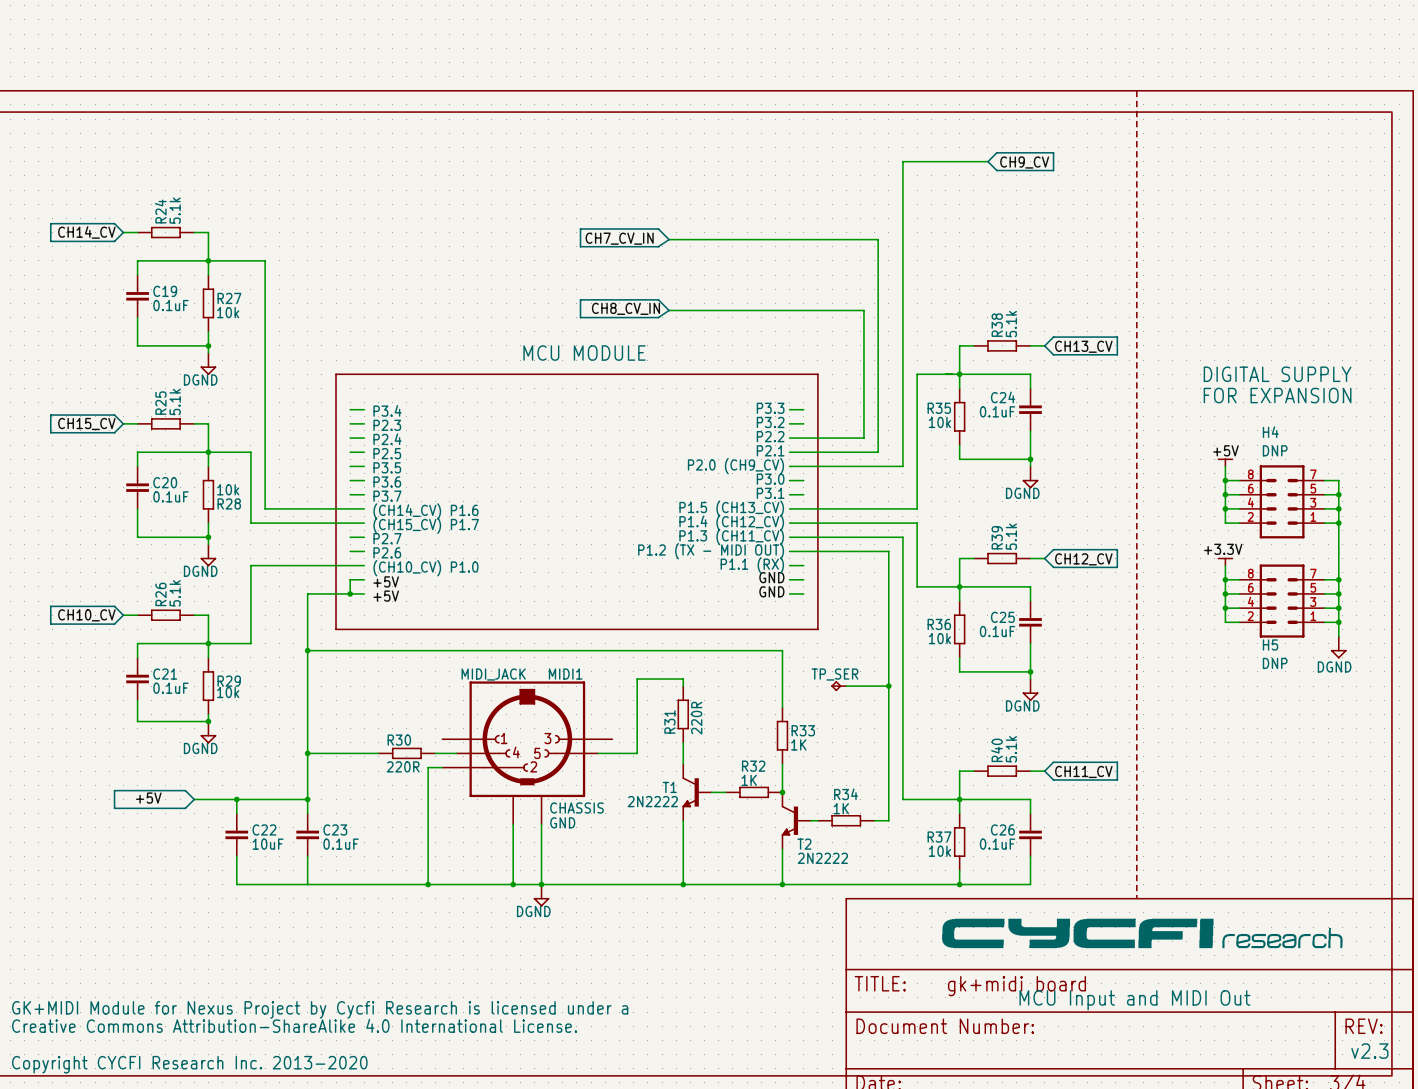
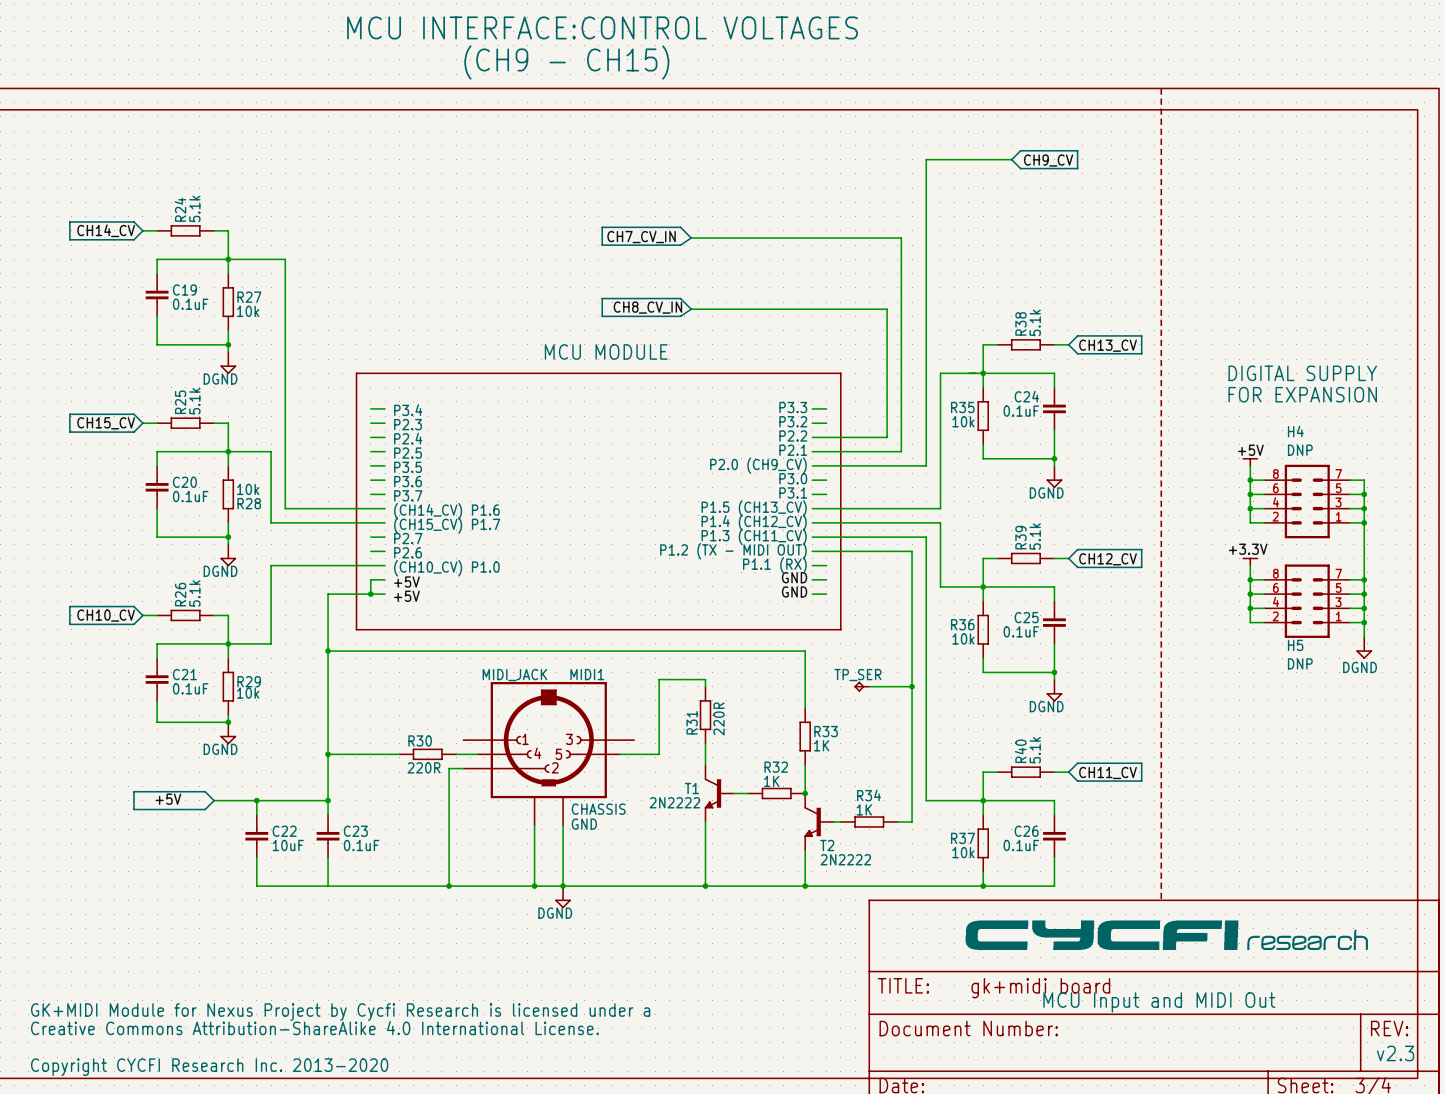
text: none -> MCU INTERFACE:CONTROL VOLTAGES (602, 27)
text: none -> (CH9 - CH15) (566, 62)

